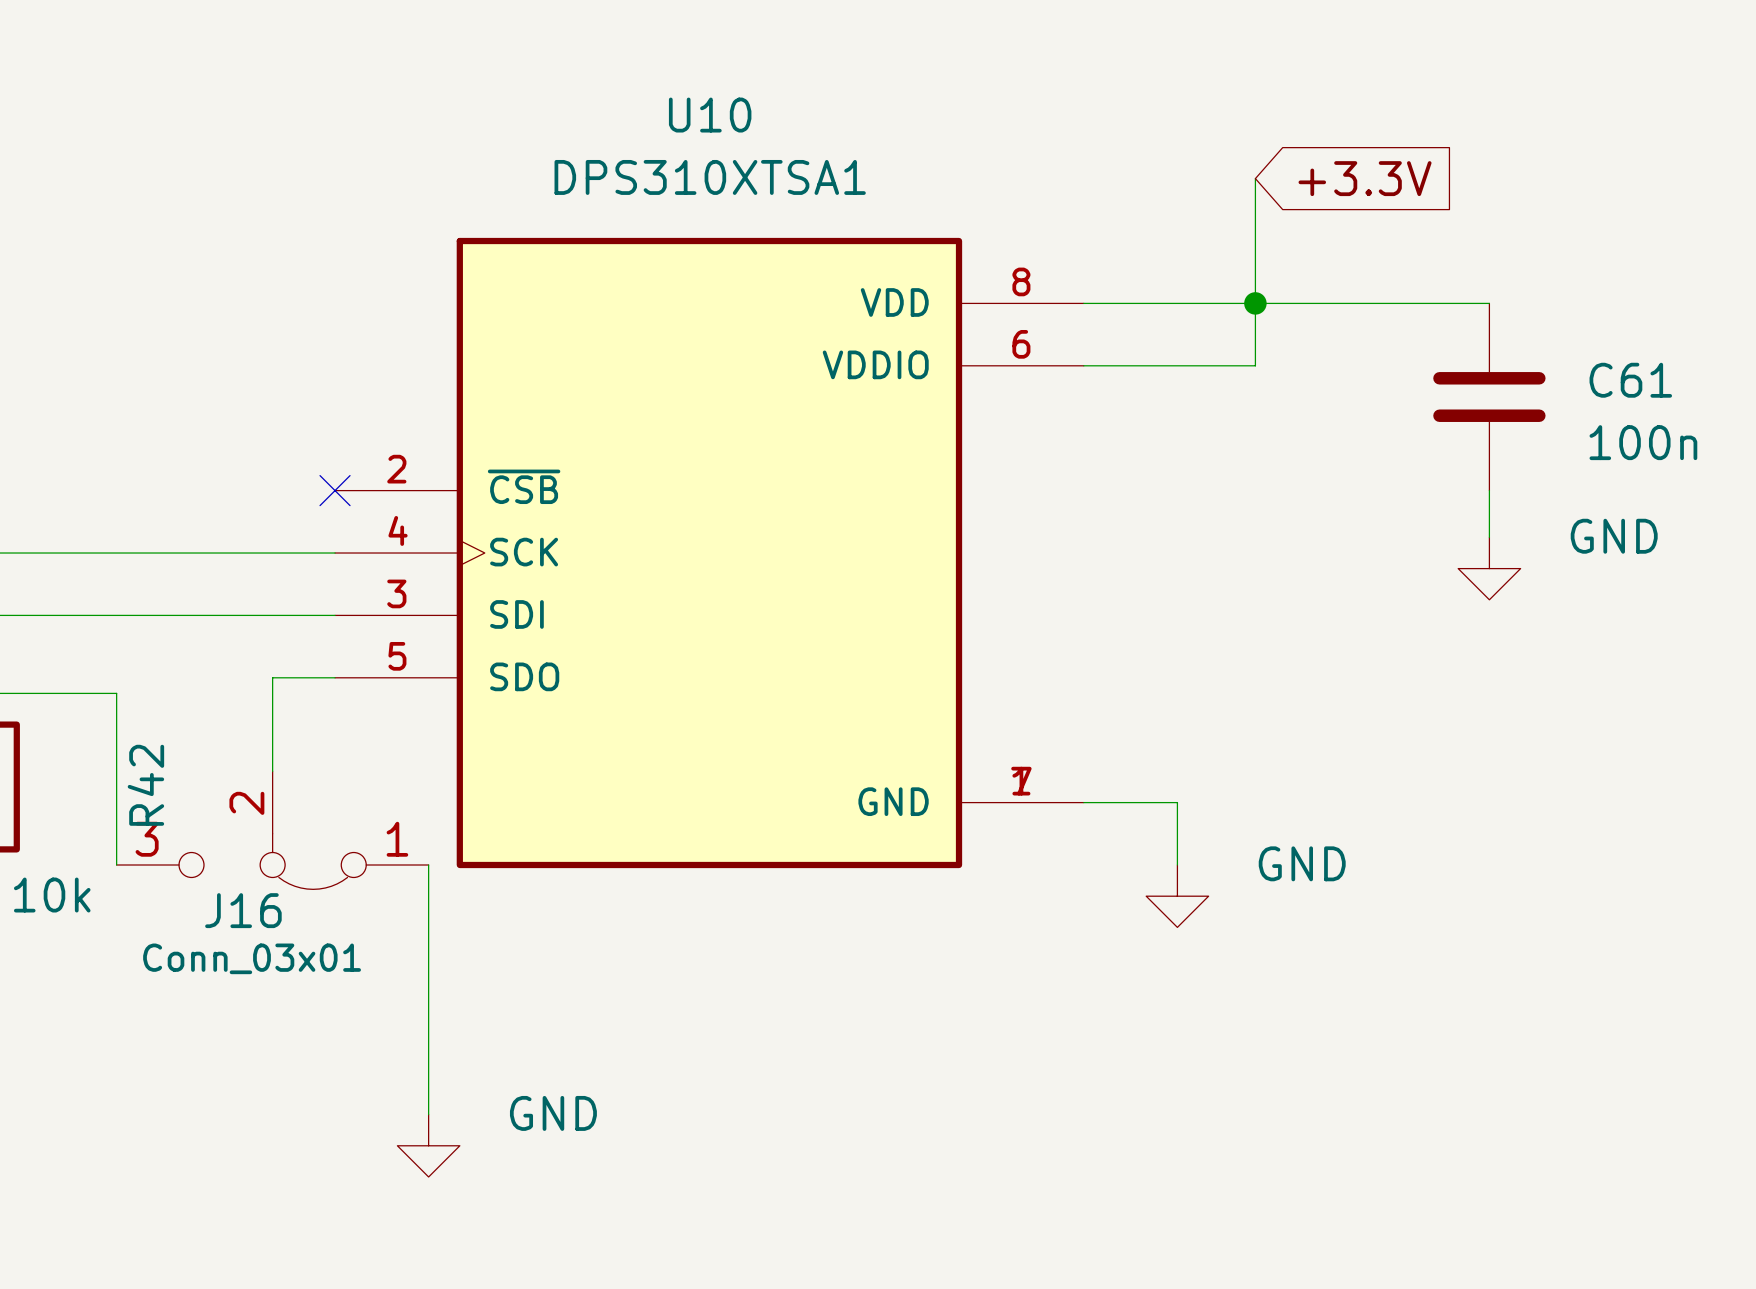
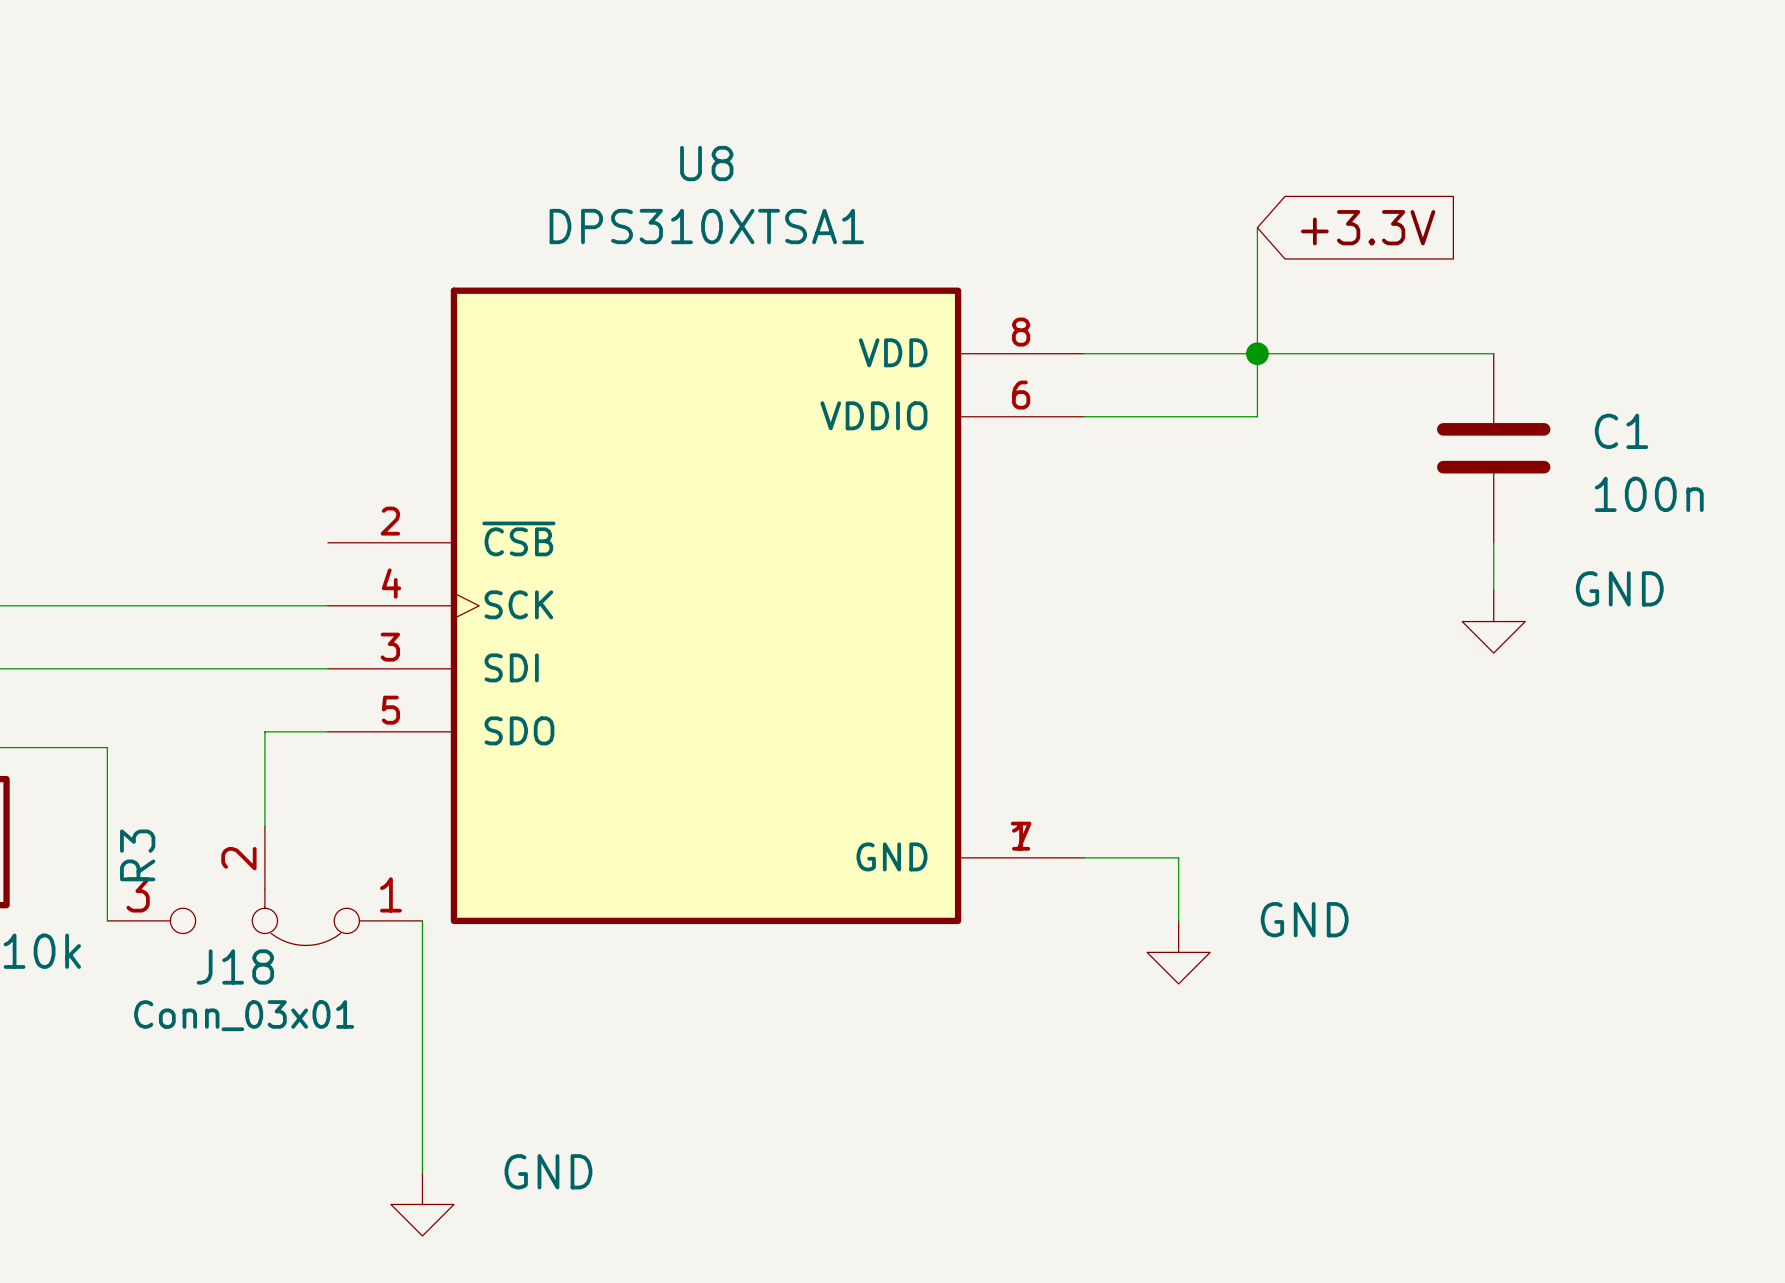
U10 name: U10 (710, 115) -> U8 (706, 163)
C61 name: C61 (1630, 380) -> C1 (1621, 431)
no-connect mark: (335, 490) -> none
R42 name: R42 (145, 785) -> R3 (137, 855)
J16 name: J16 (243, 910) -> J18 (235, 966)

